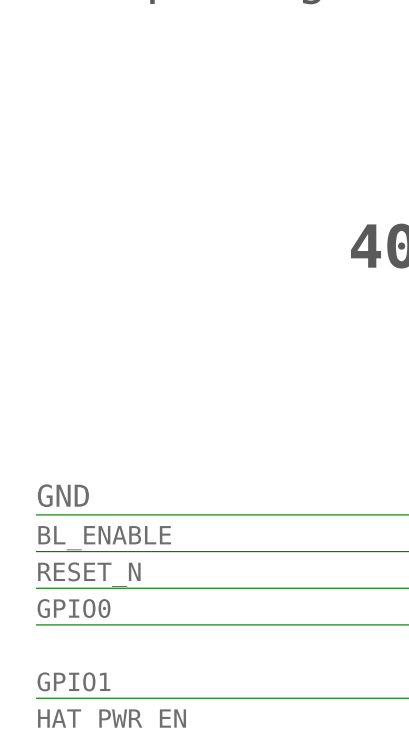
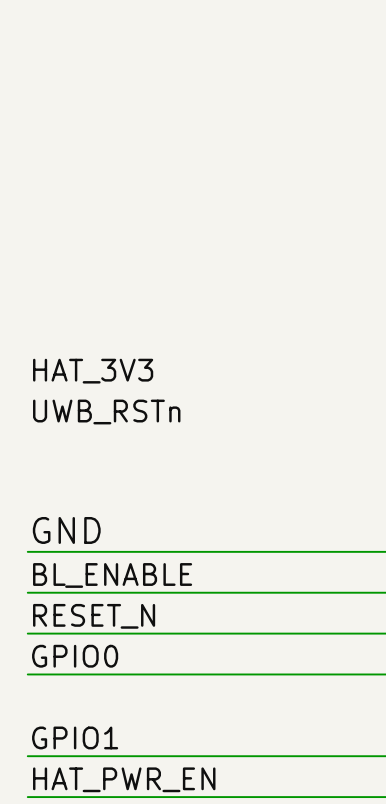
label: none -> HAT_3V3 (93, 371)
label: none -> UWB_RSTn (106, 412)

